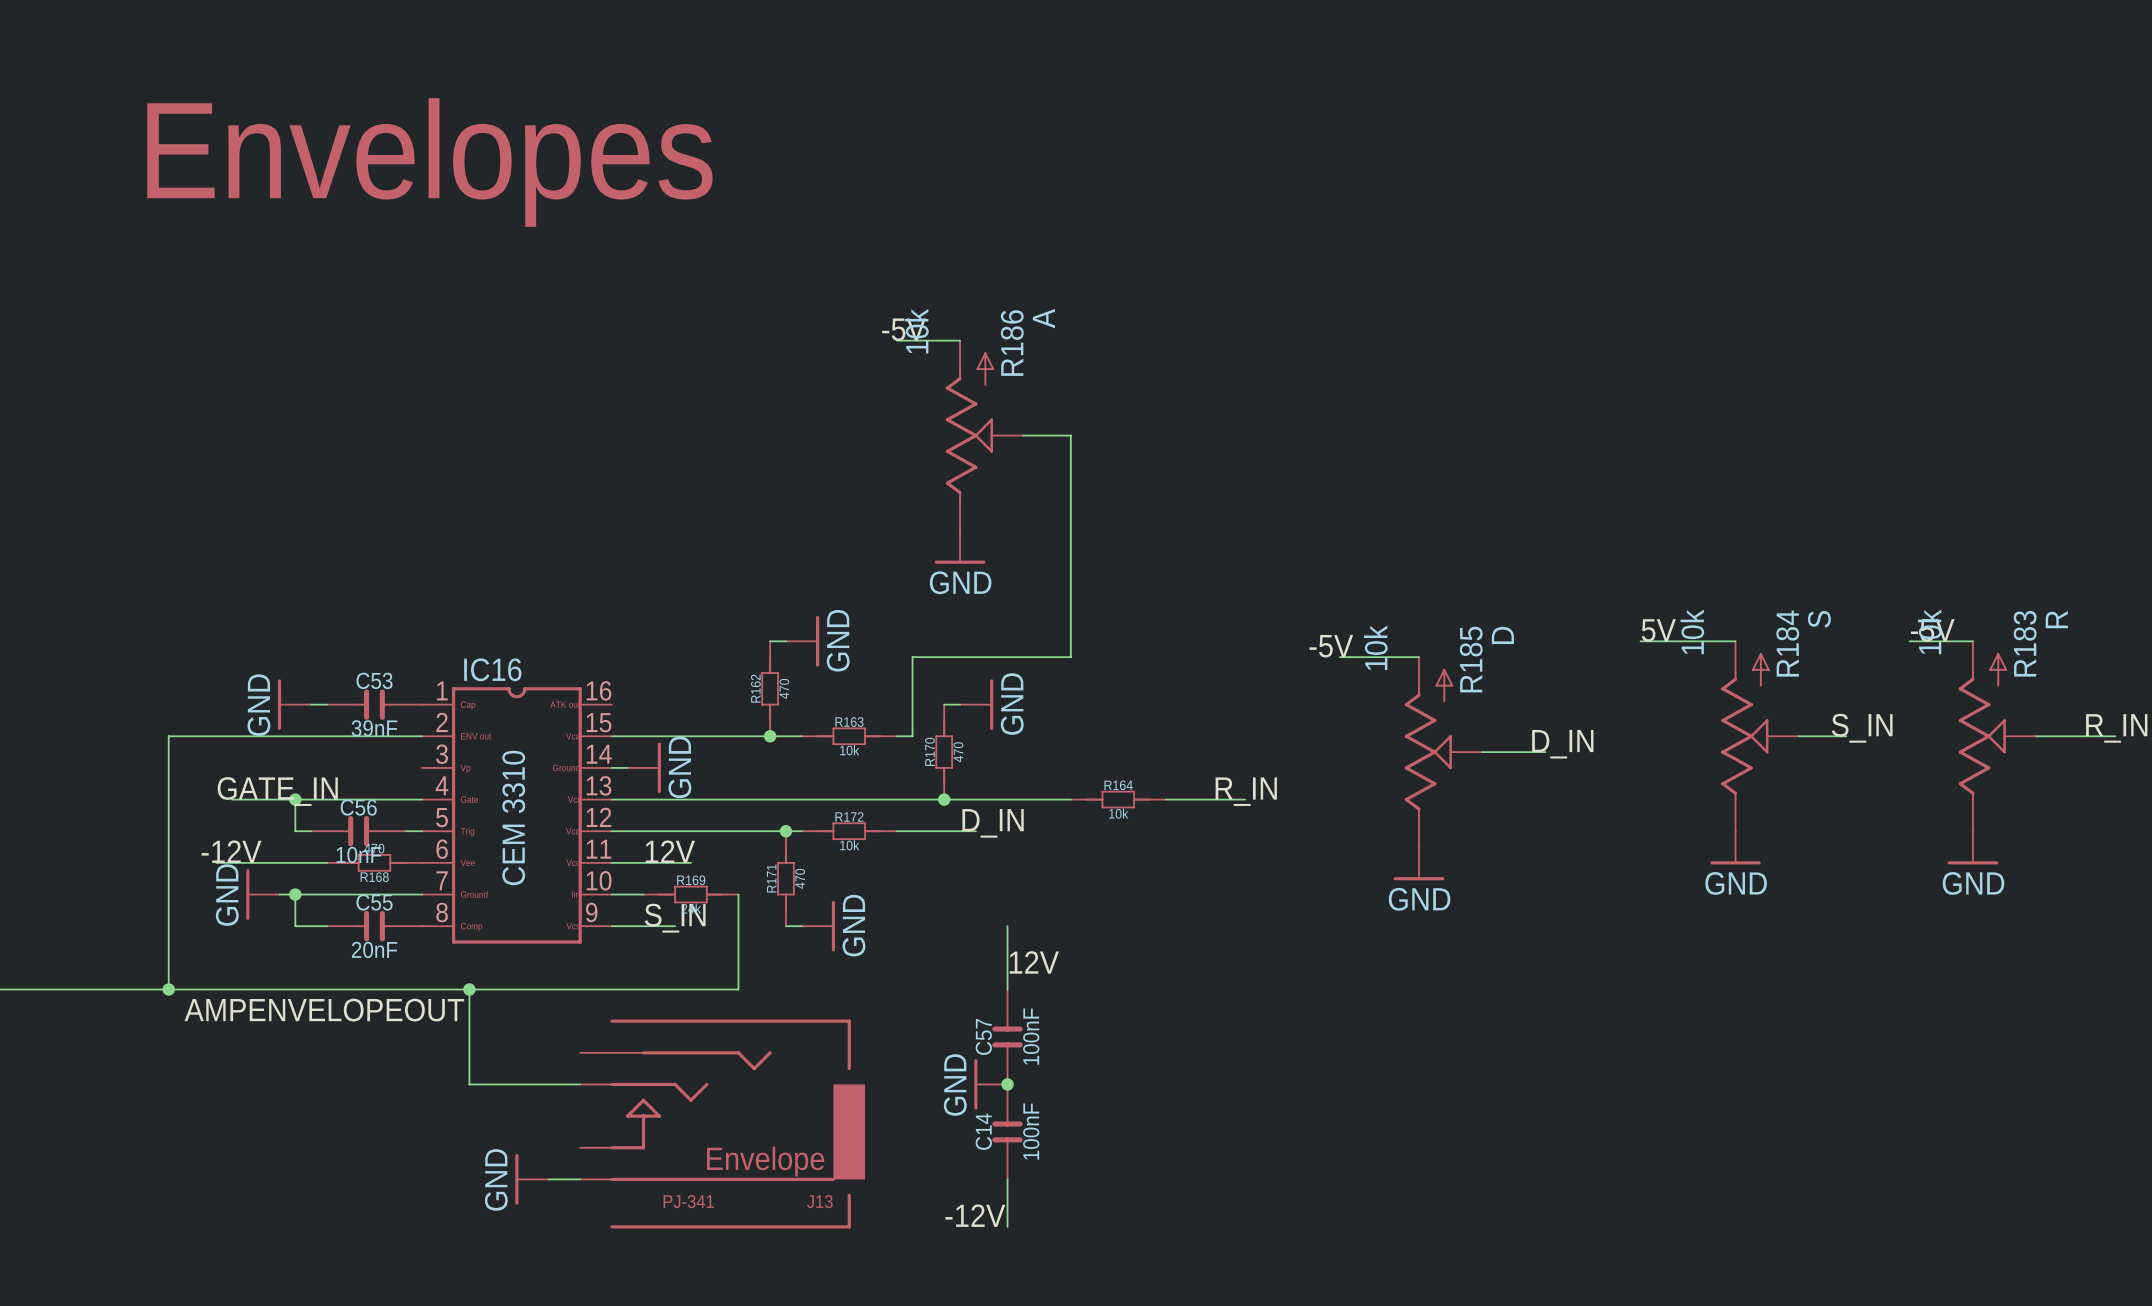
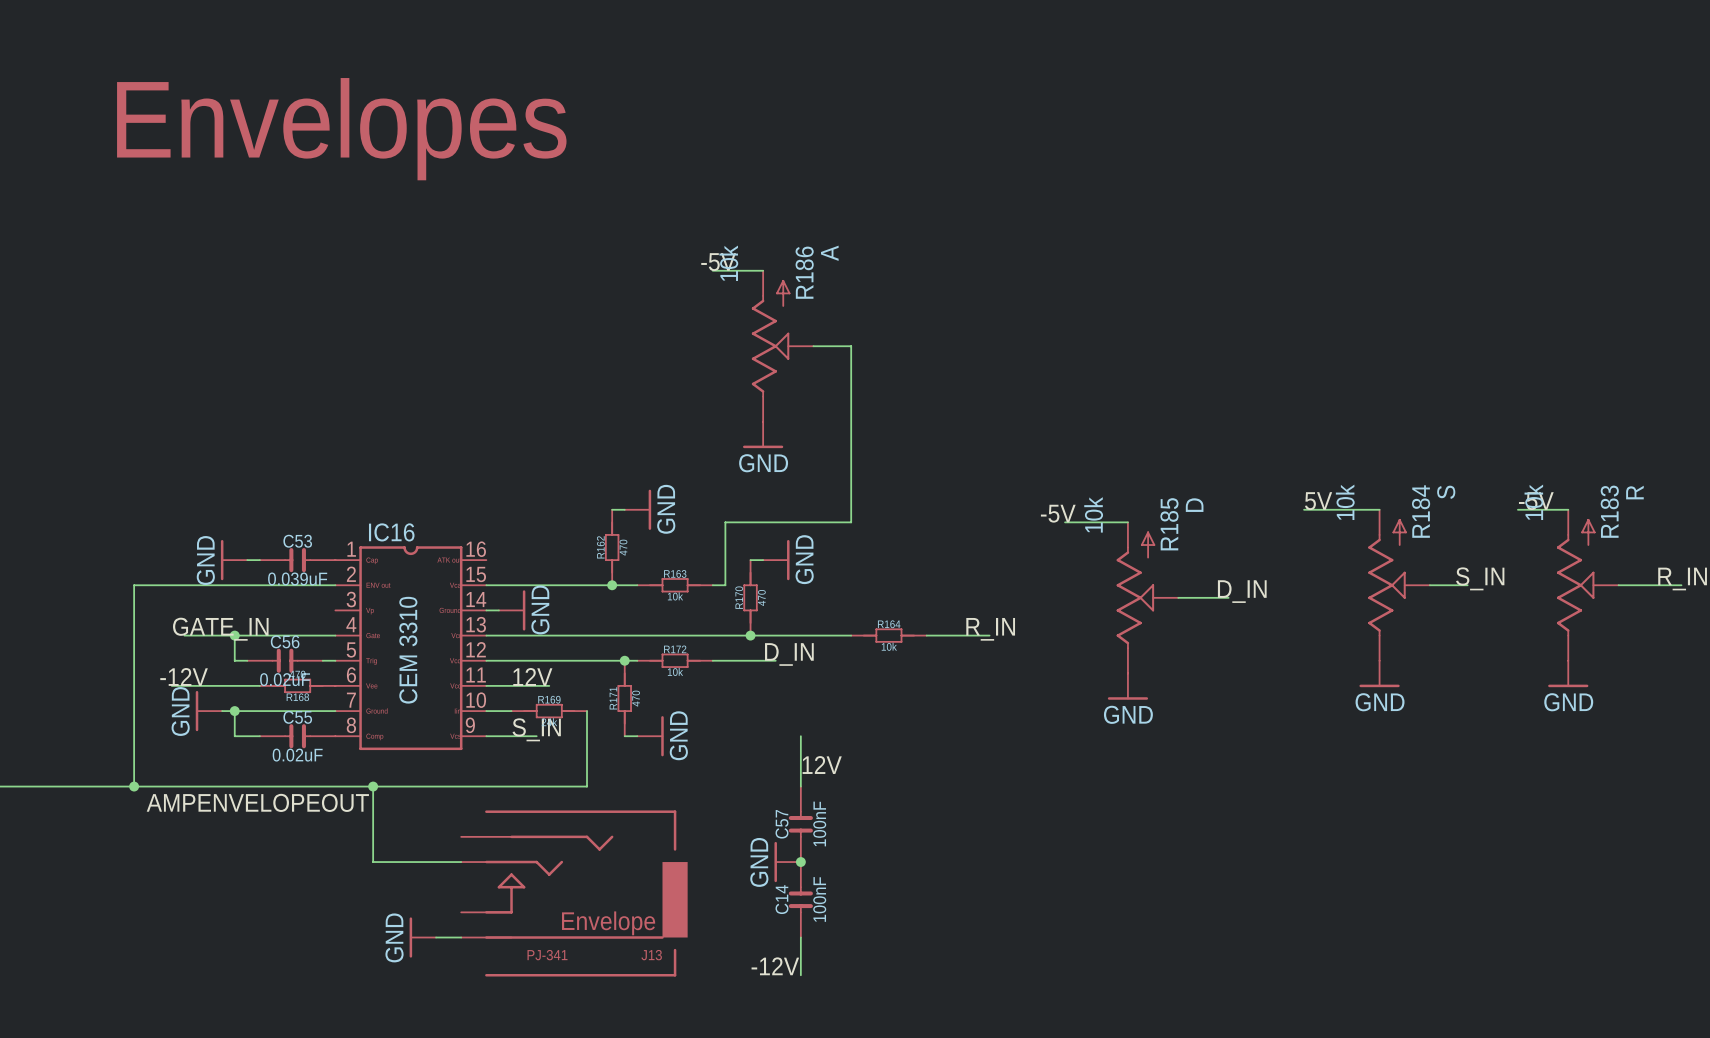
C53 value: 39nF (374, 728) -> 0.039uF (297, 578)
C56 value: 10nF (359, 854) -> 0.02uF (285, 679)
C55 value: 20nF (374, 949) -> 0.02uF (297, 755)

